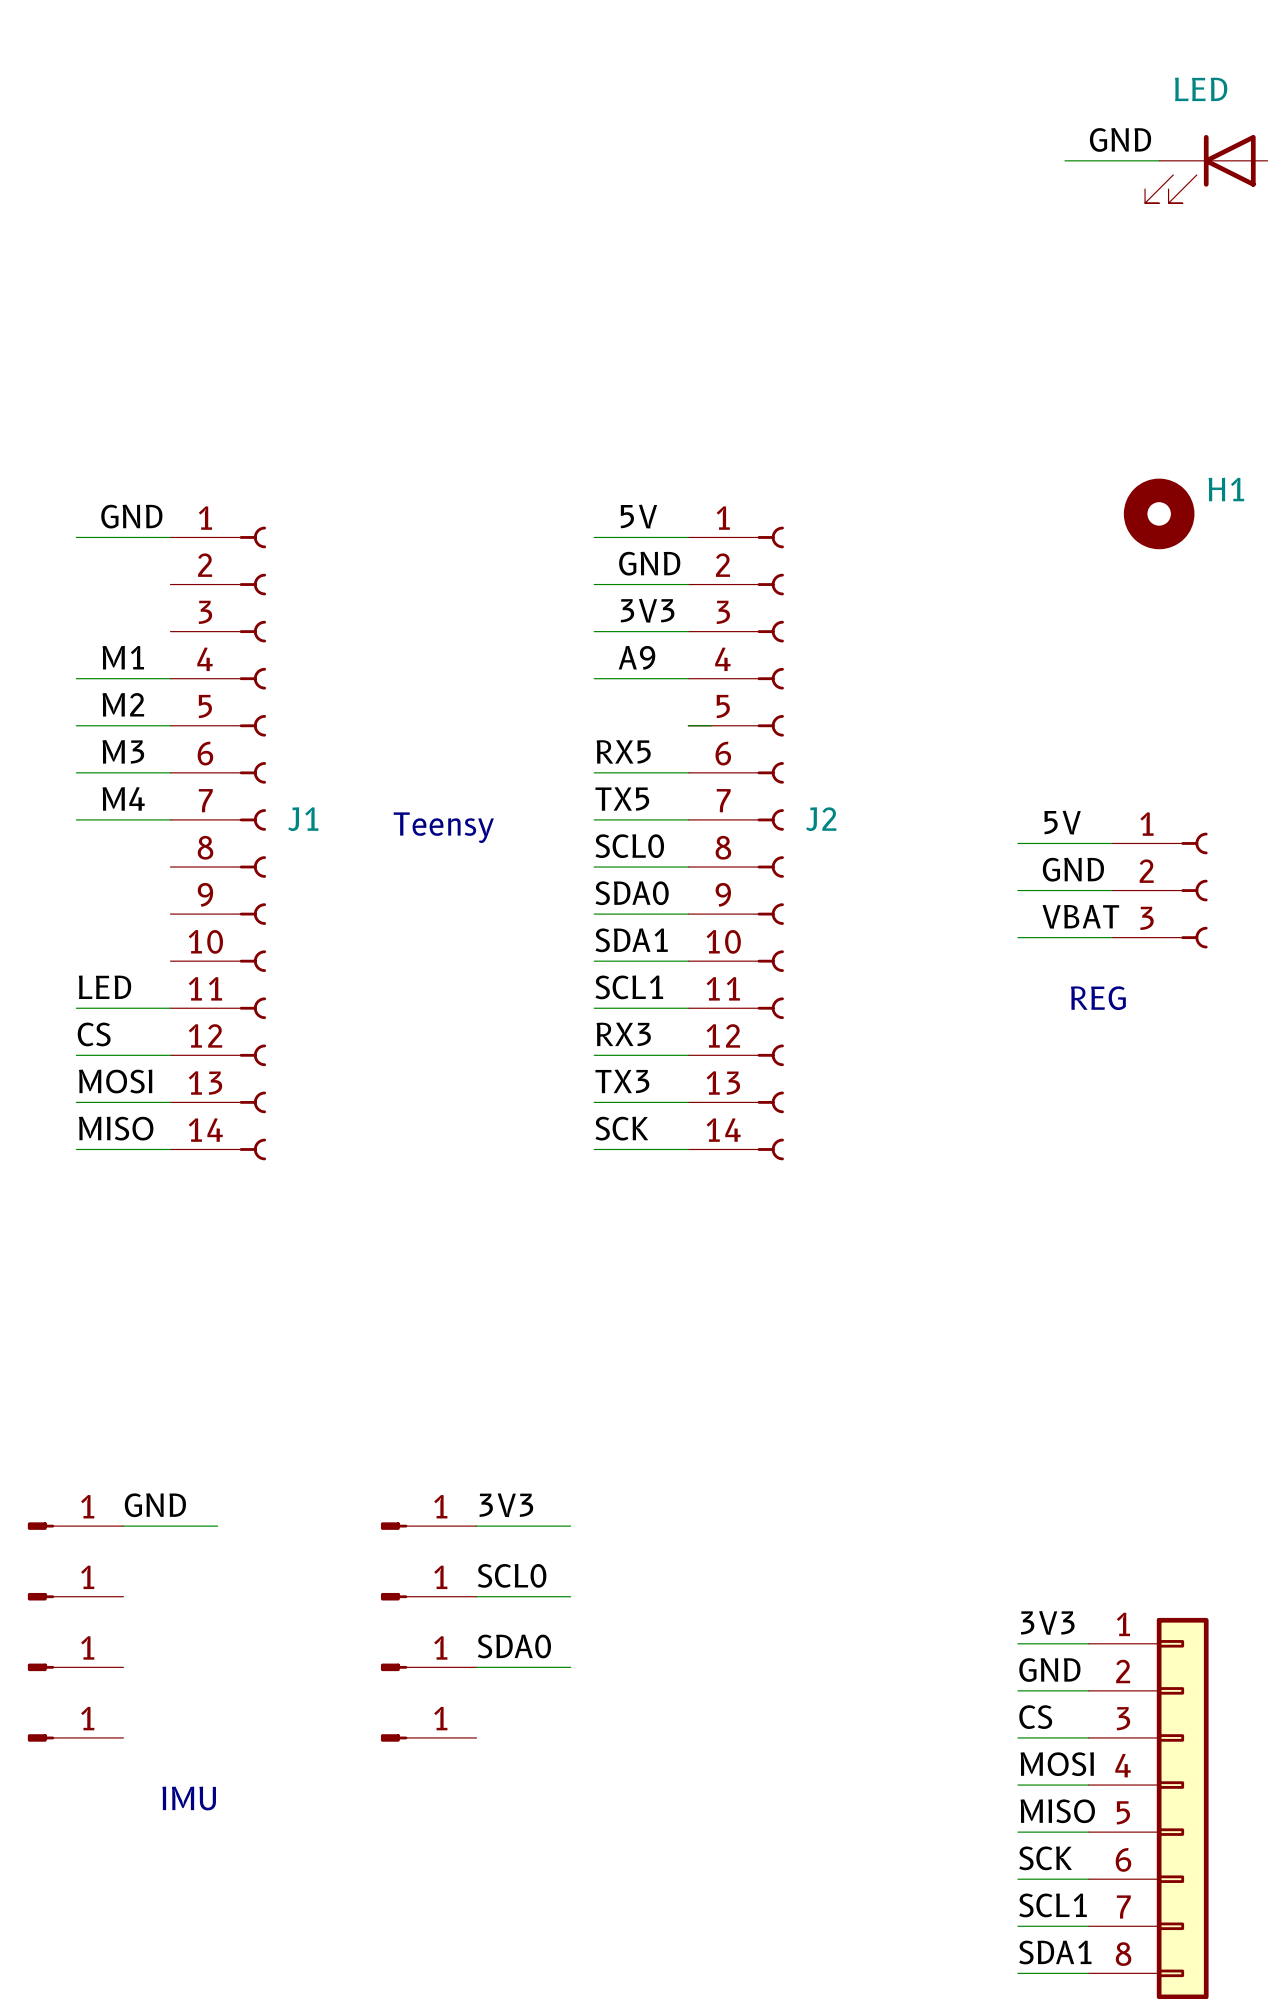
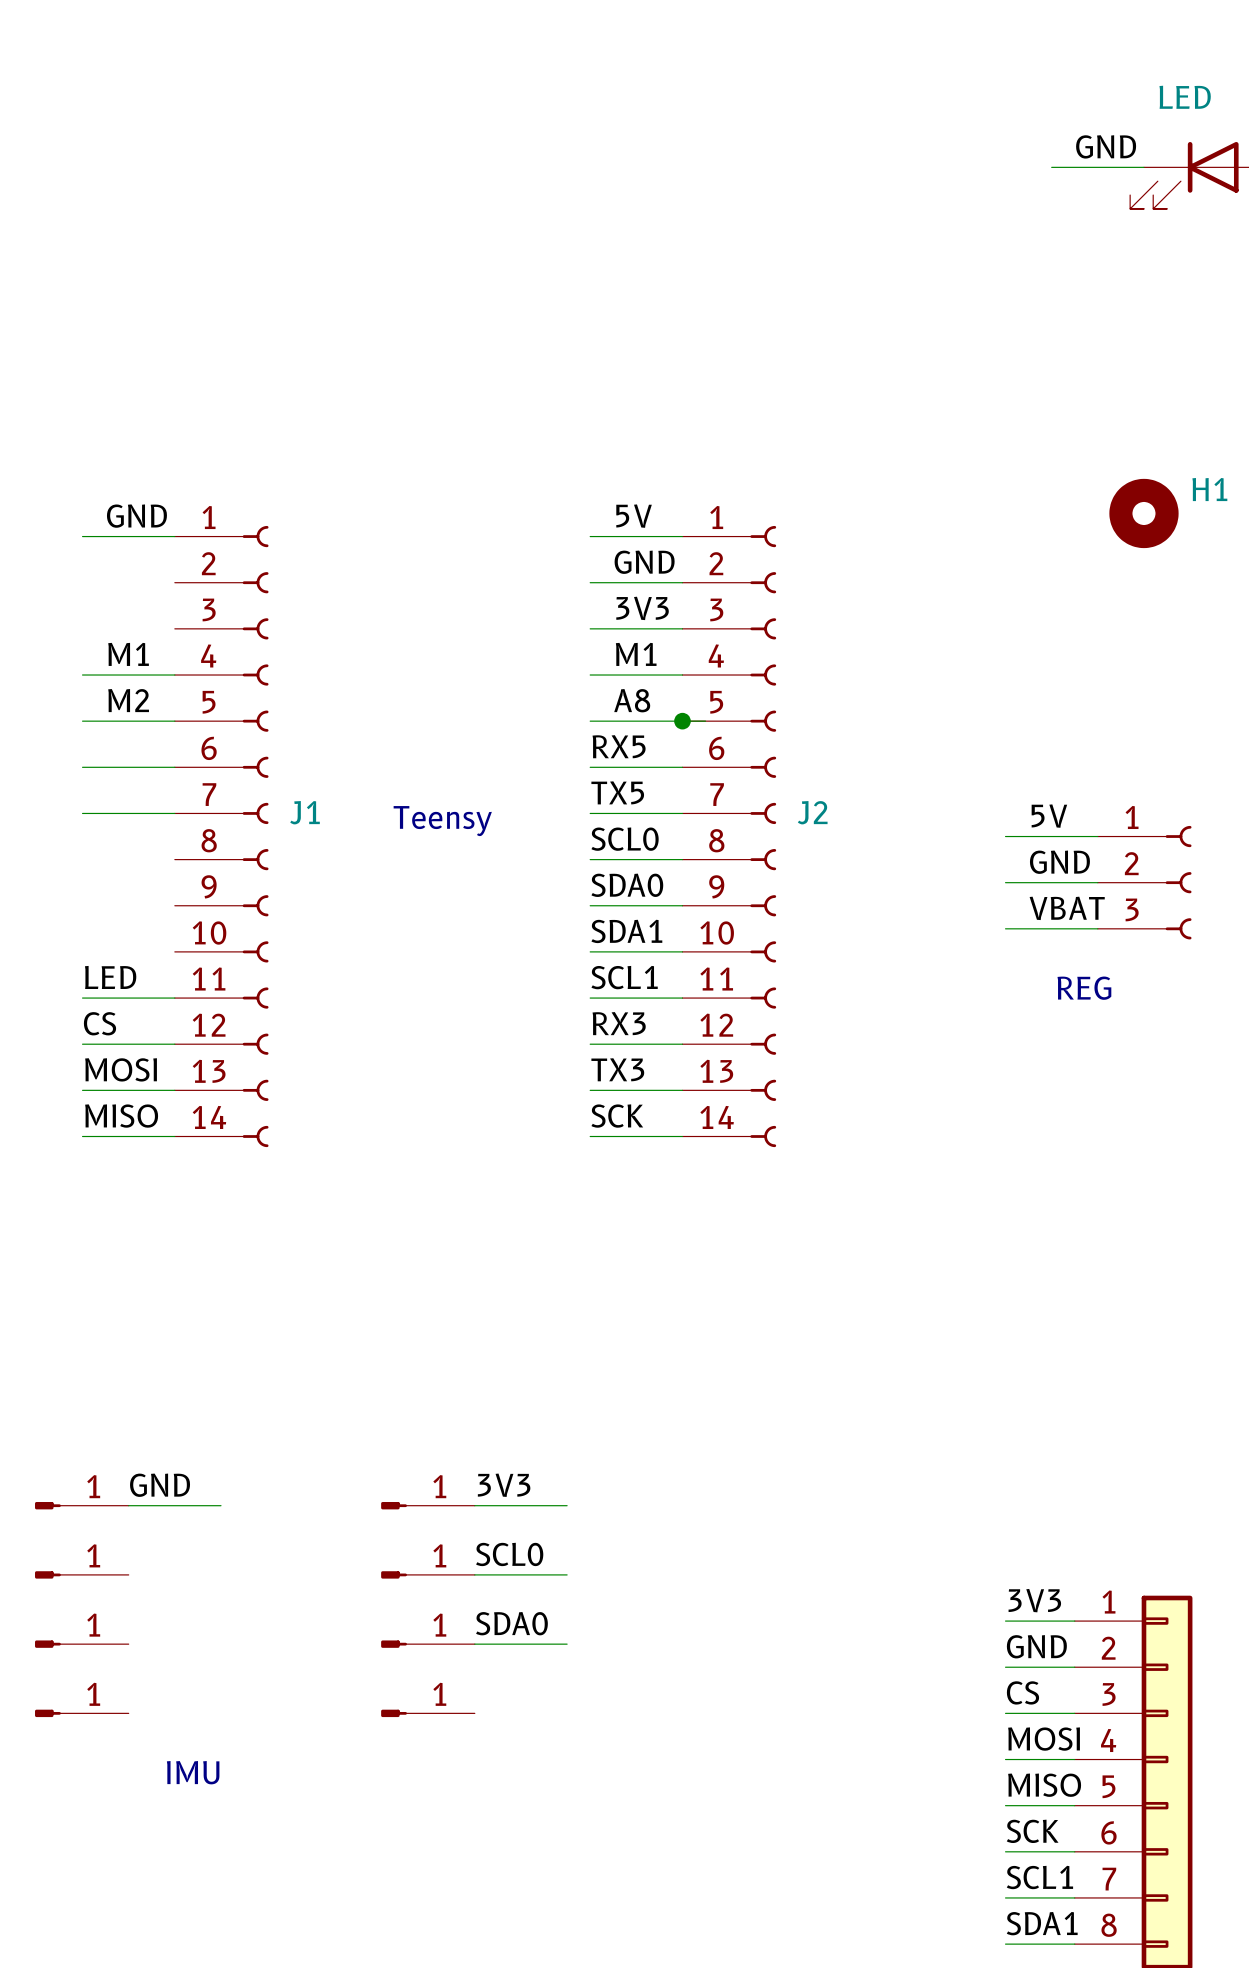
label: A9 (636, 657) -> M1 (636, 654)
label: none -> A8 (632, 700)
wire: none -> (590, 721) (682, 721)
junction: none -> (682, 721)
label: M3 (123, 751) -> none
label: M4 (123, 798) -> none

